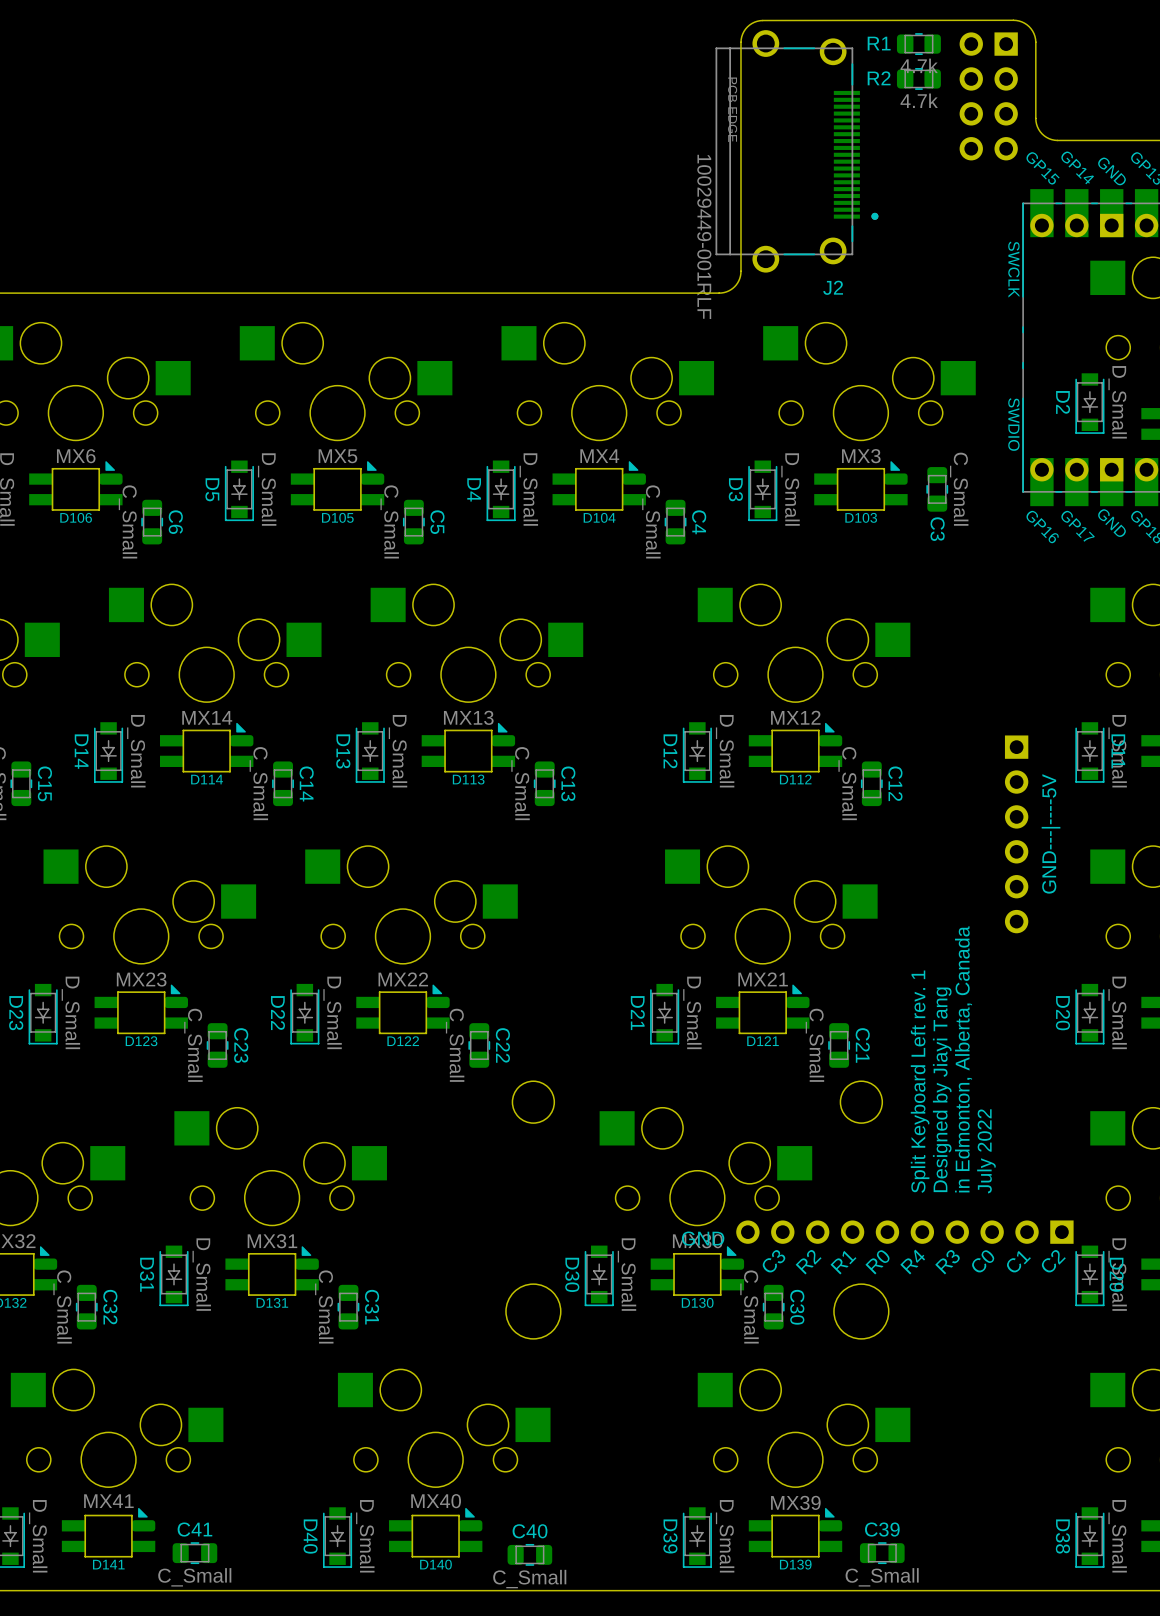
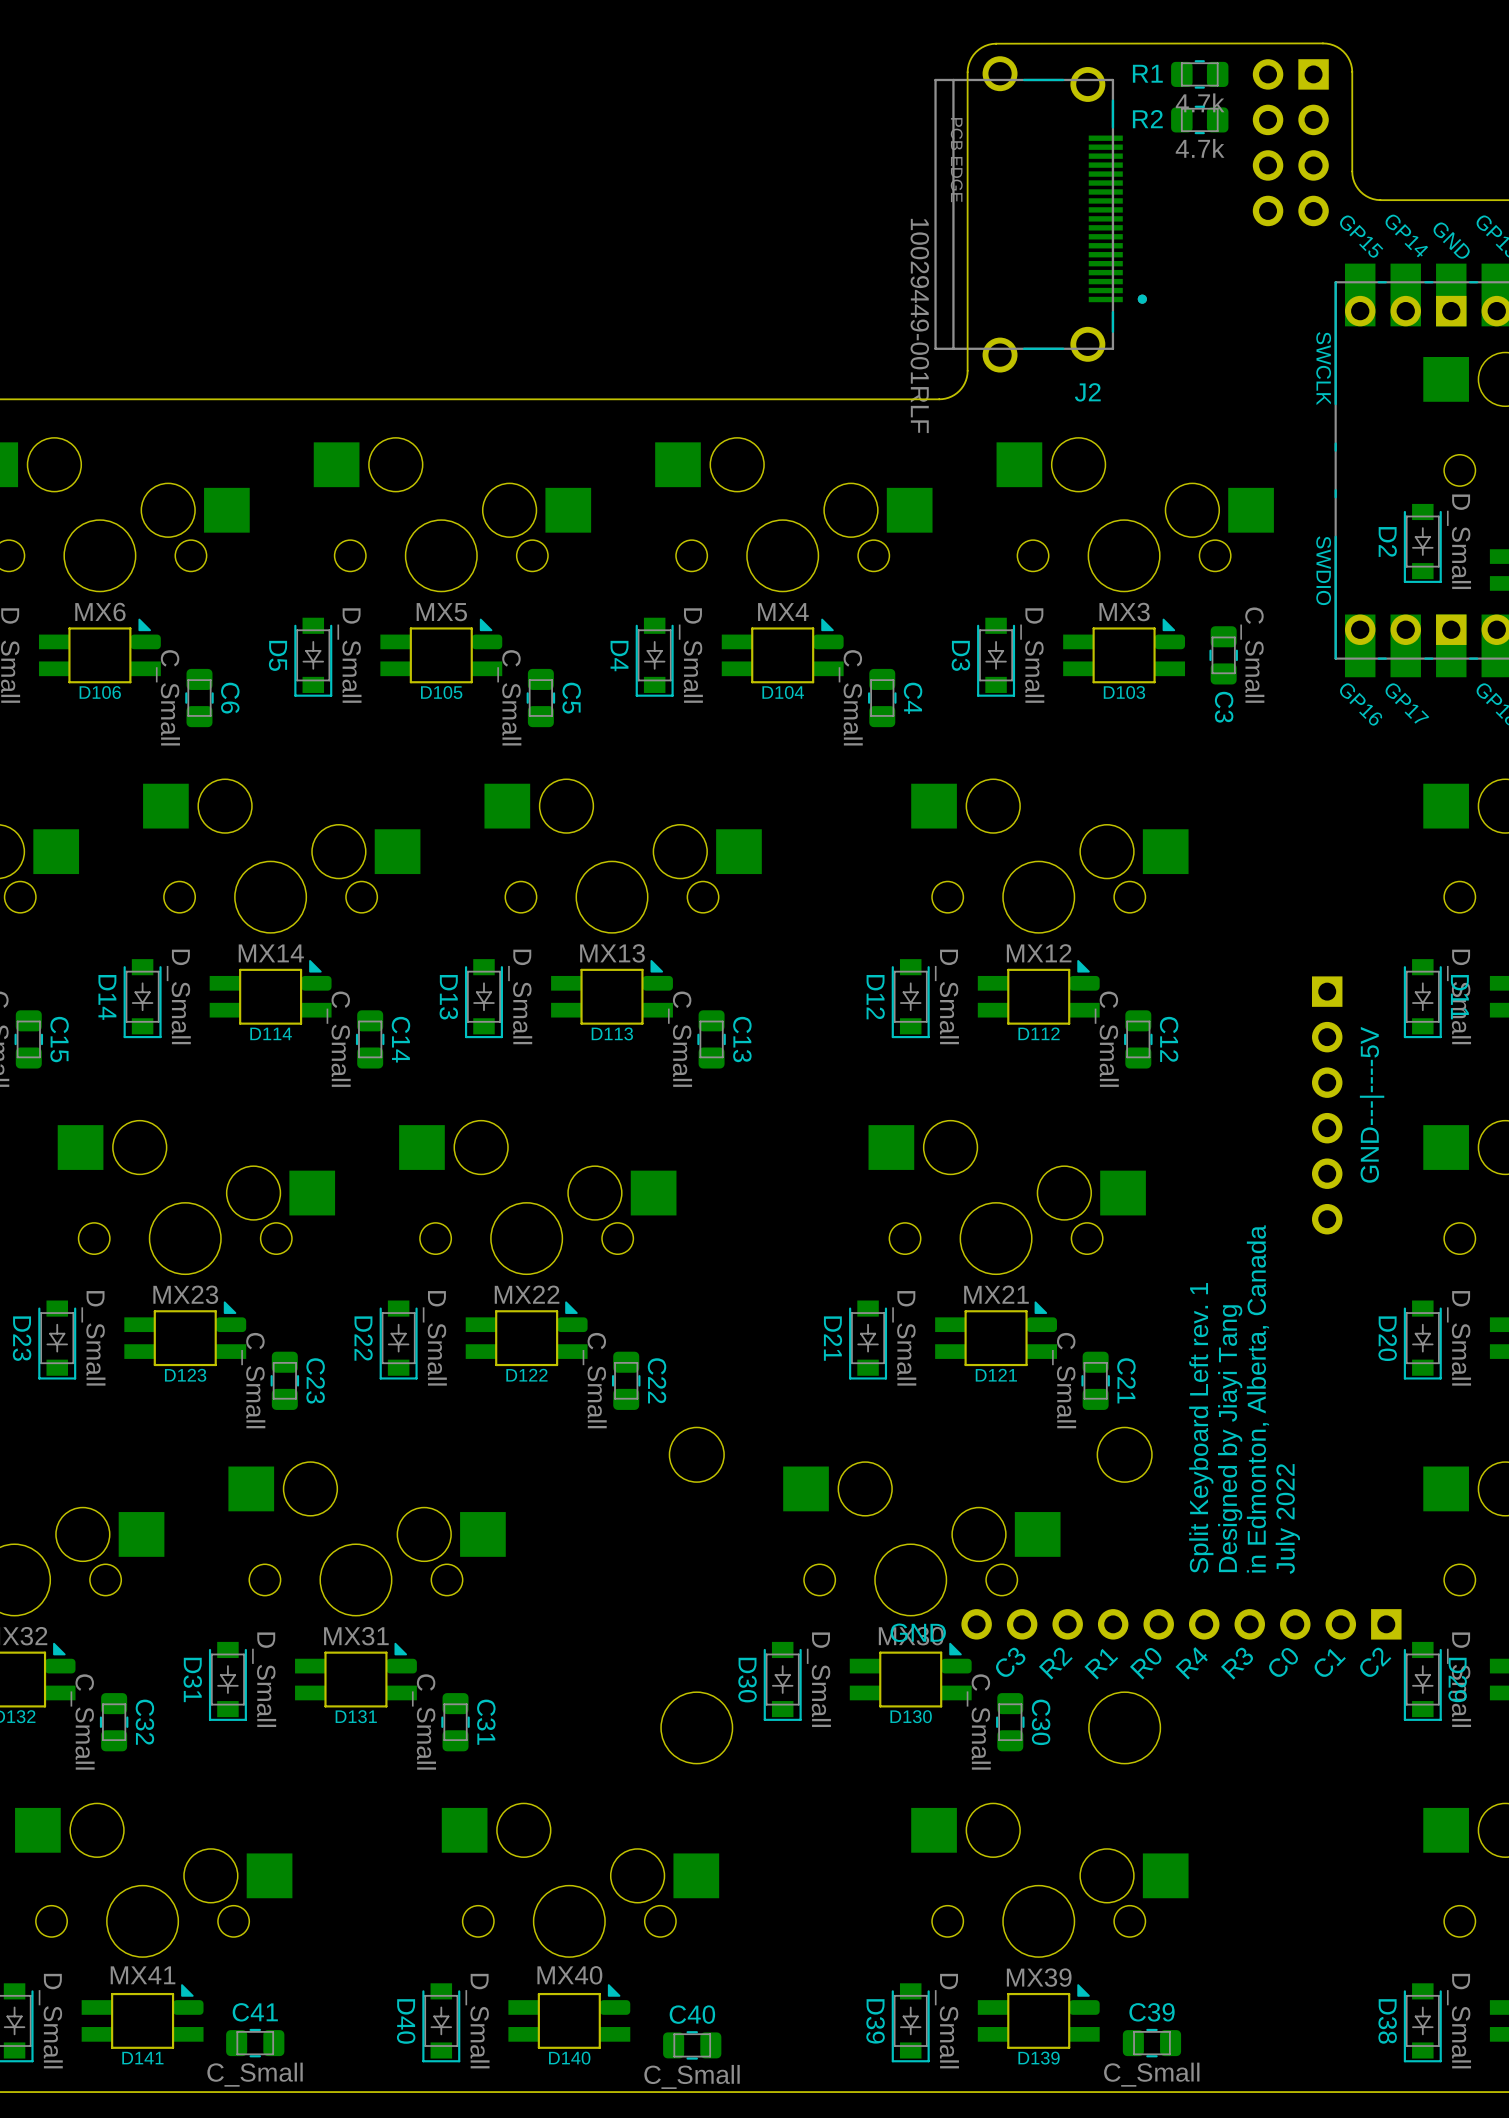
part text: GND (1111, 523) -> none

